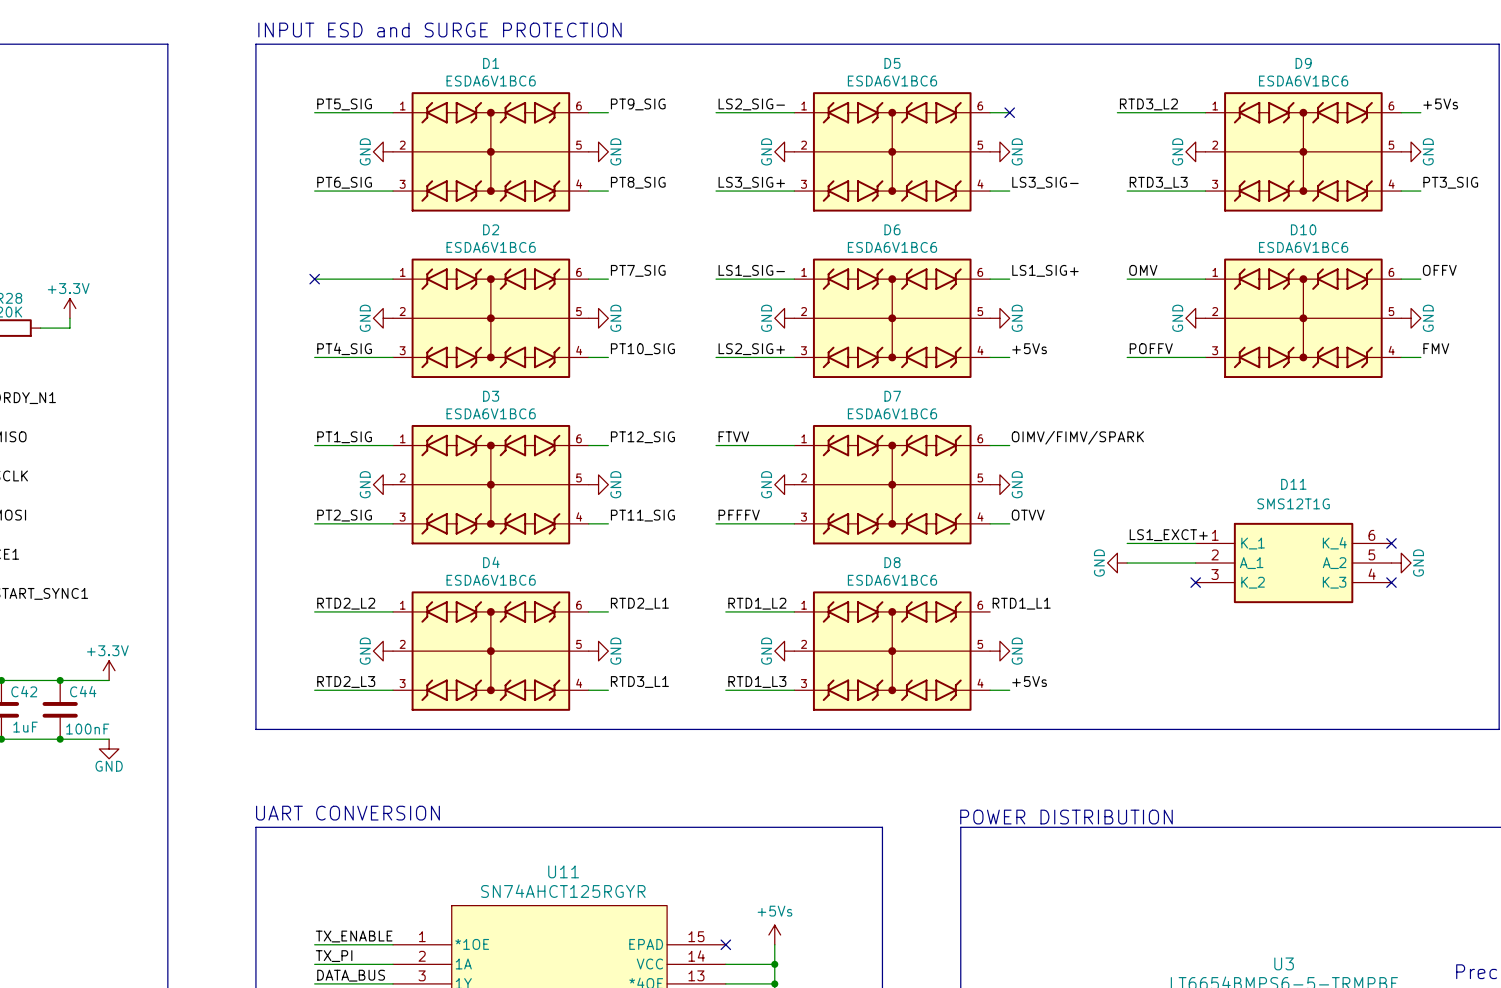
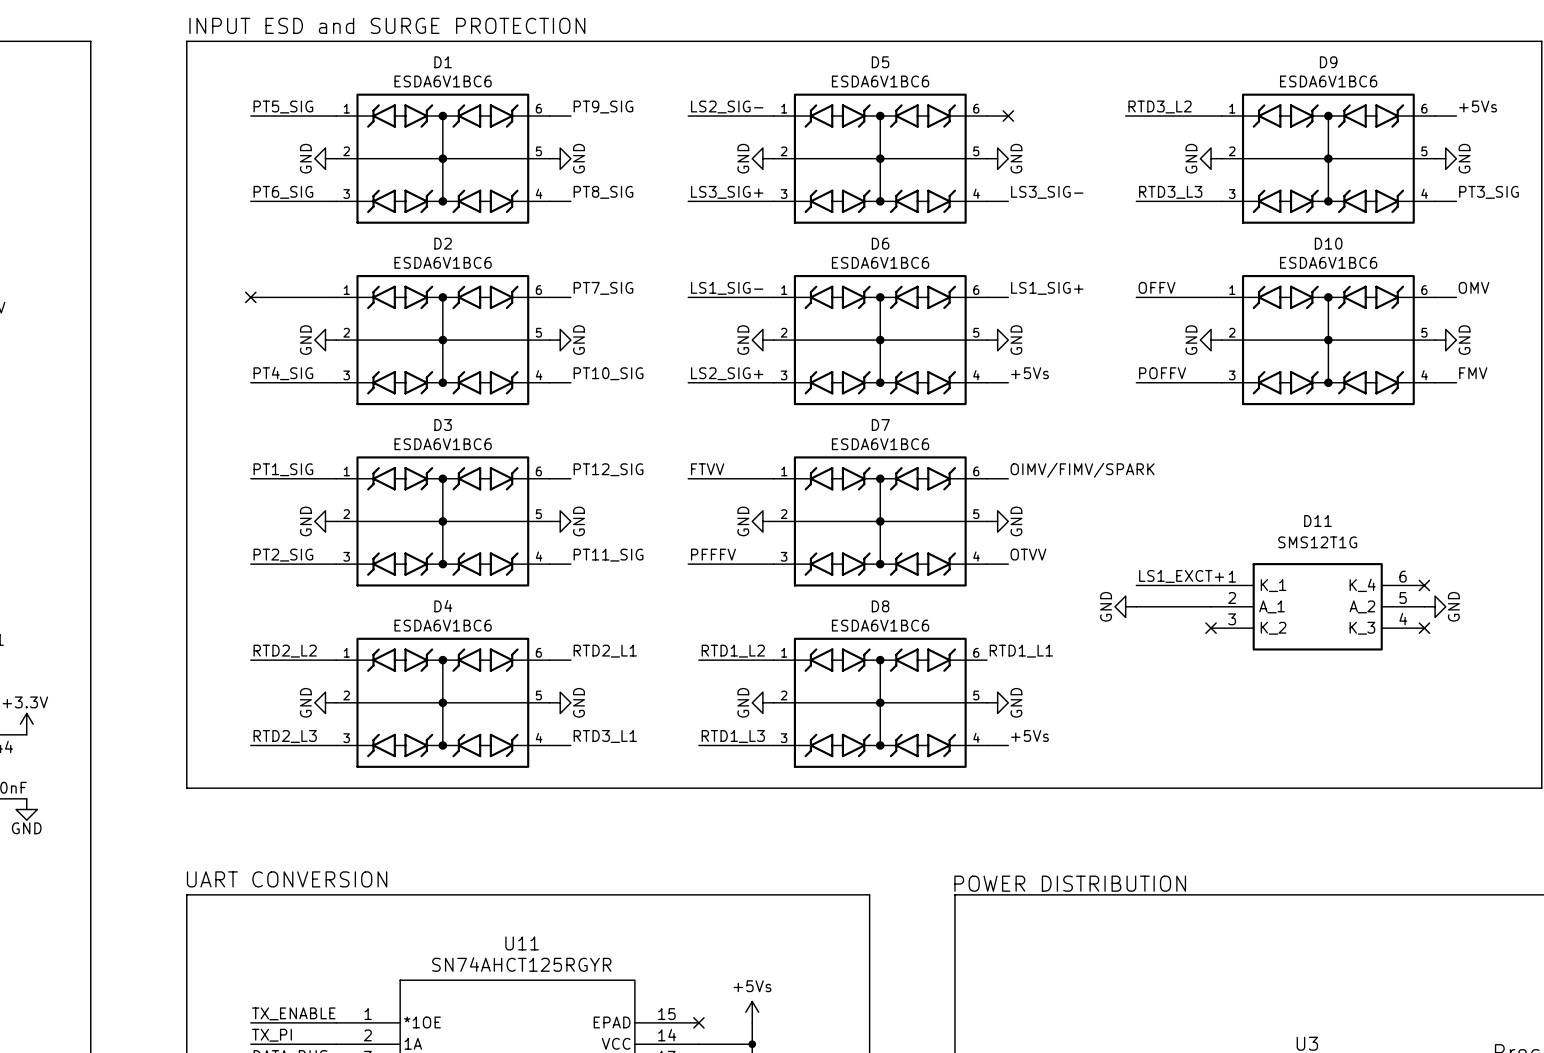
label: OMV (1143, 270) -> OFFV (1157, 287)
label: OFFV (1439, 270) -> OMV (1474, 287)

